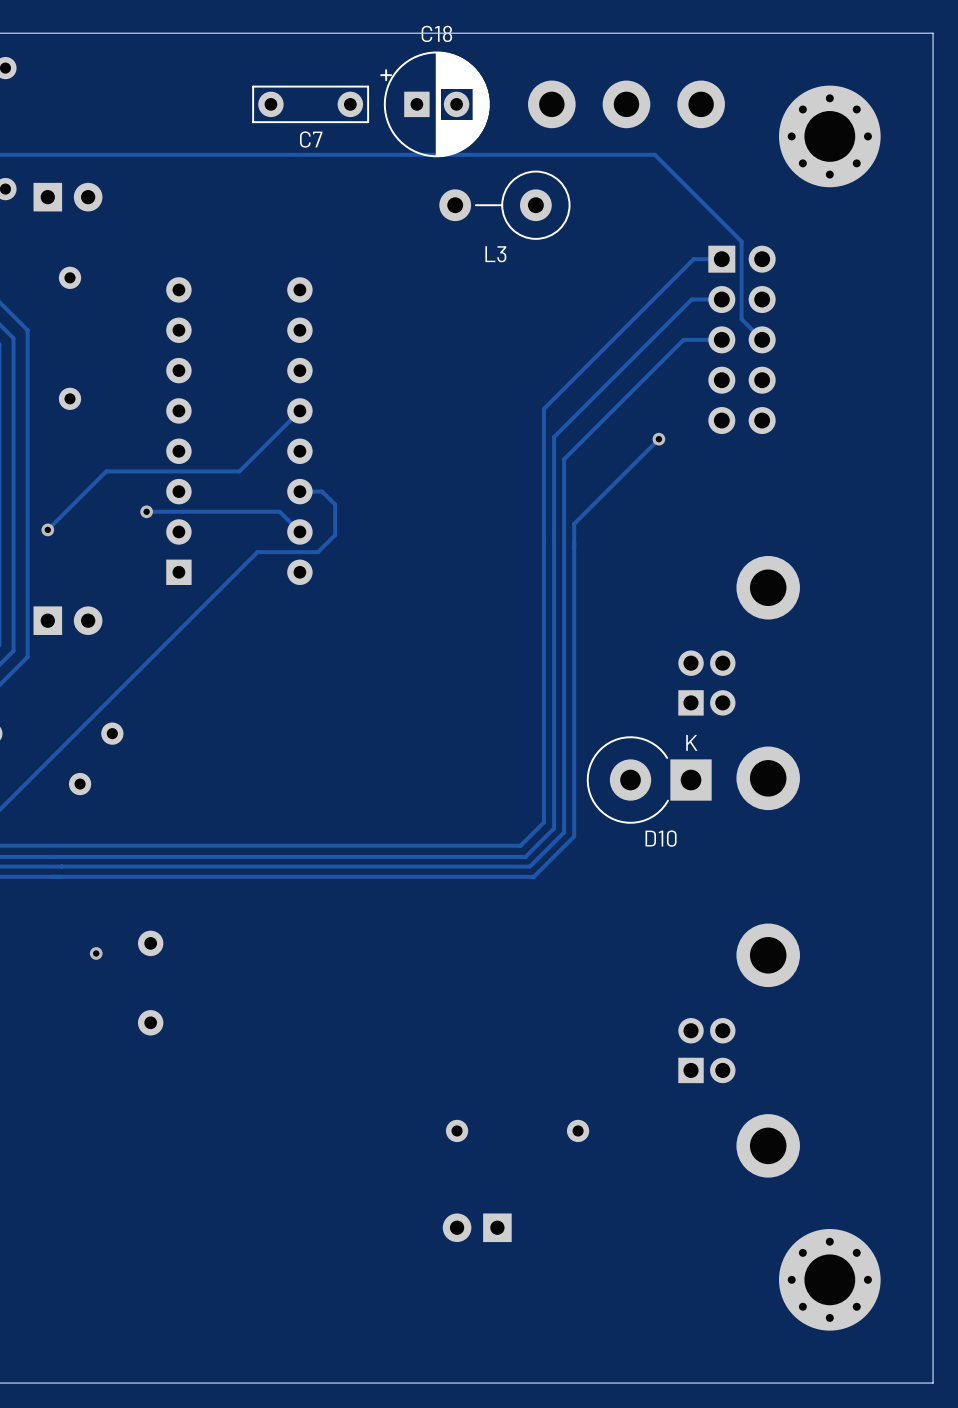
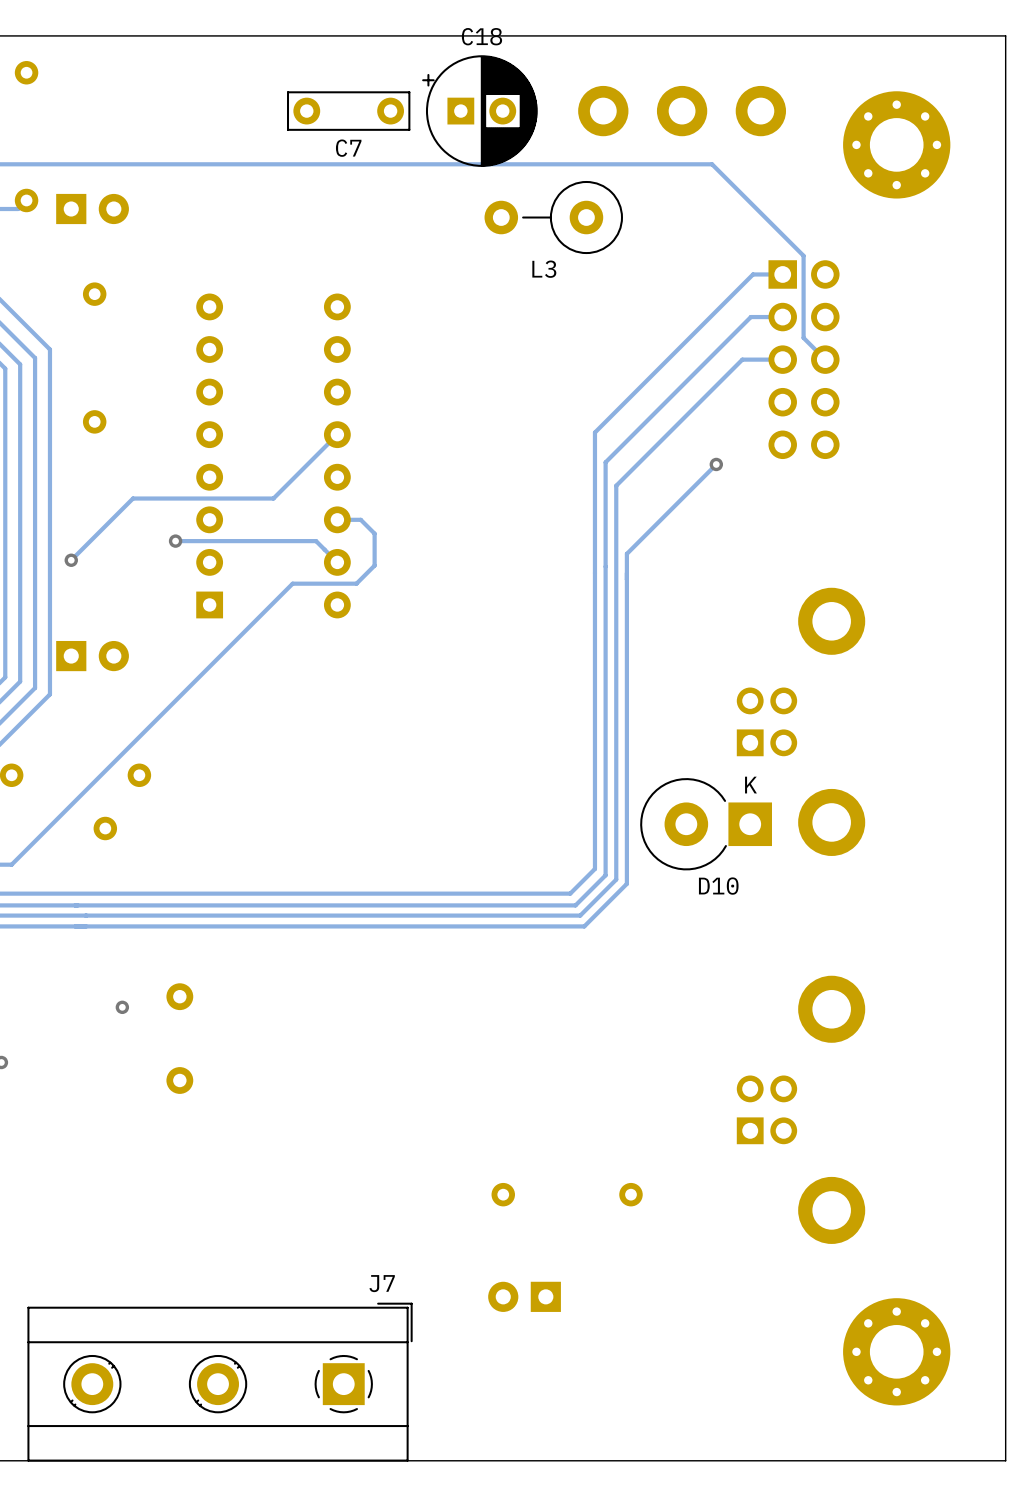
J7: none -> (220, 1382)

